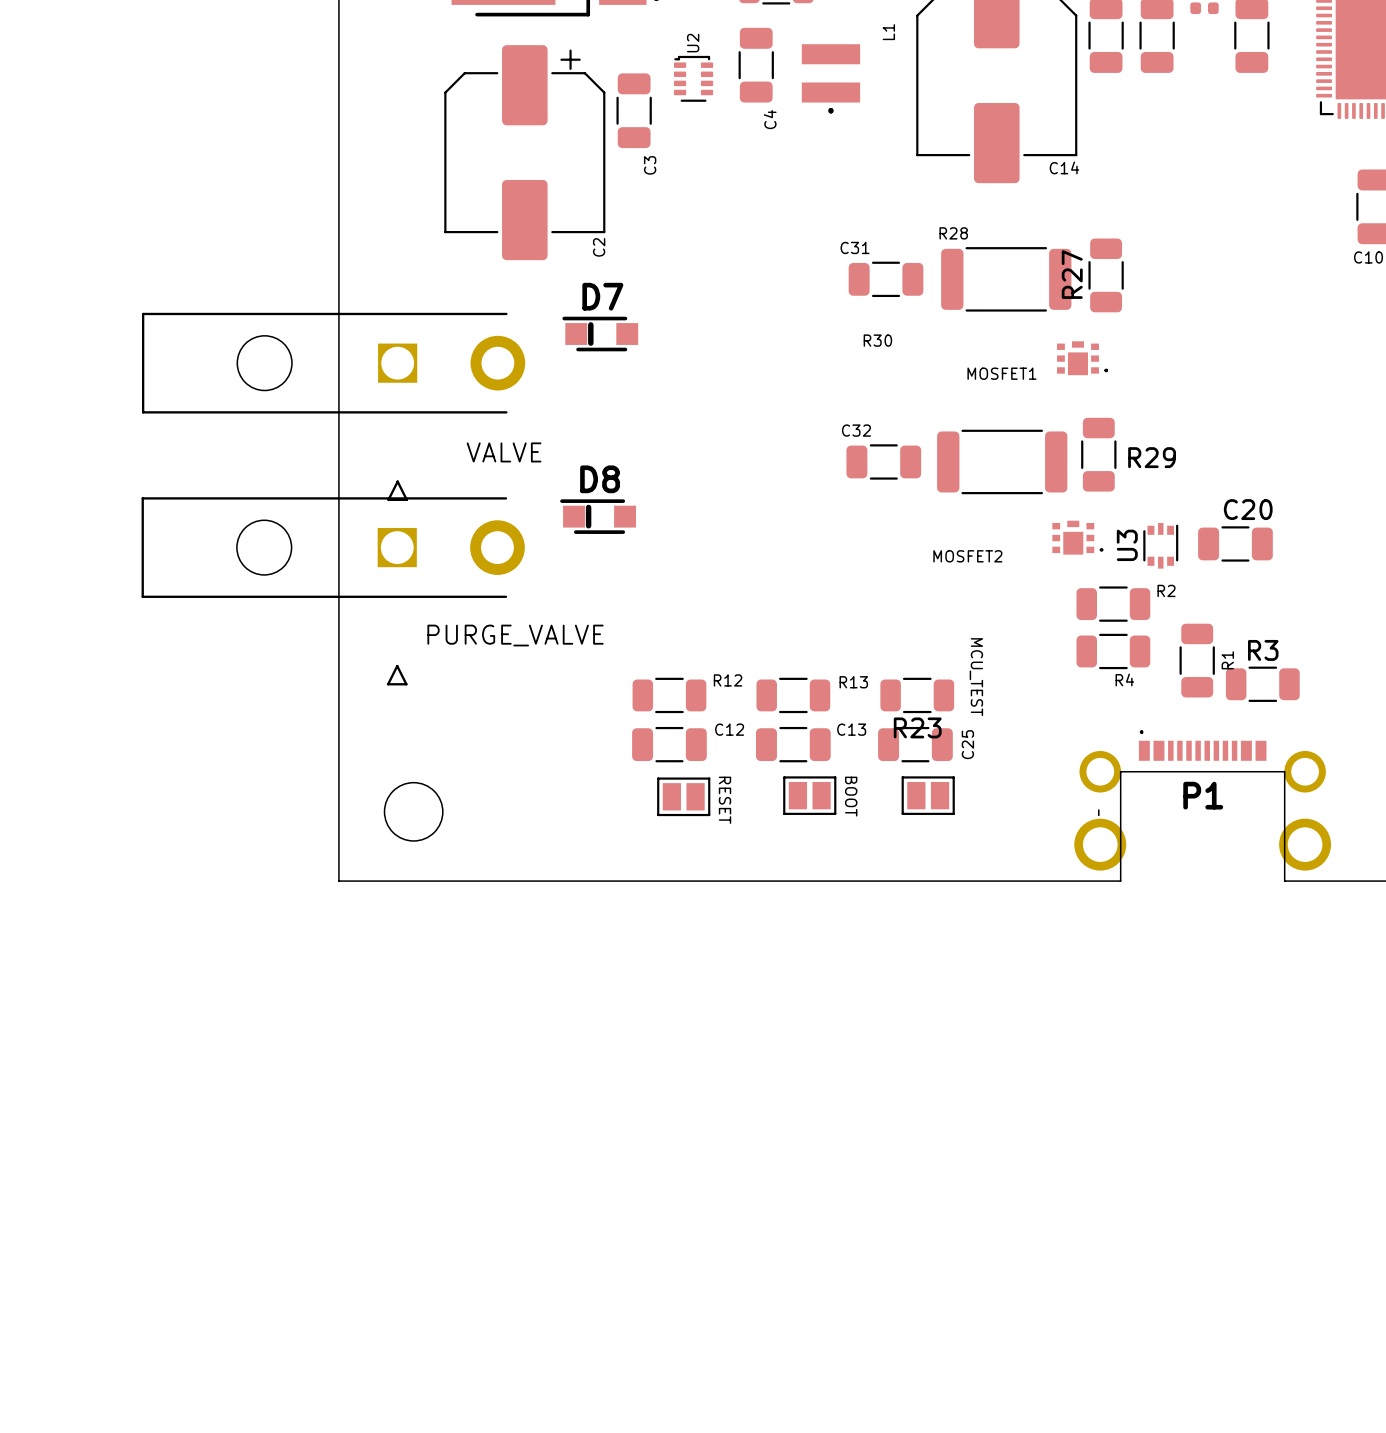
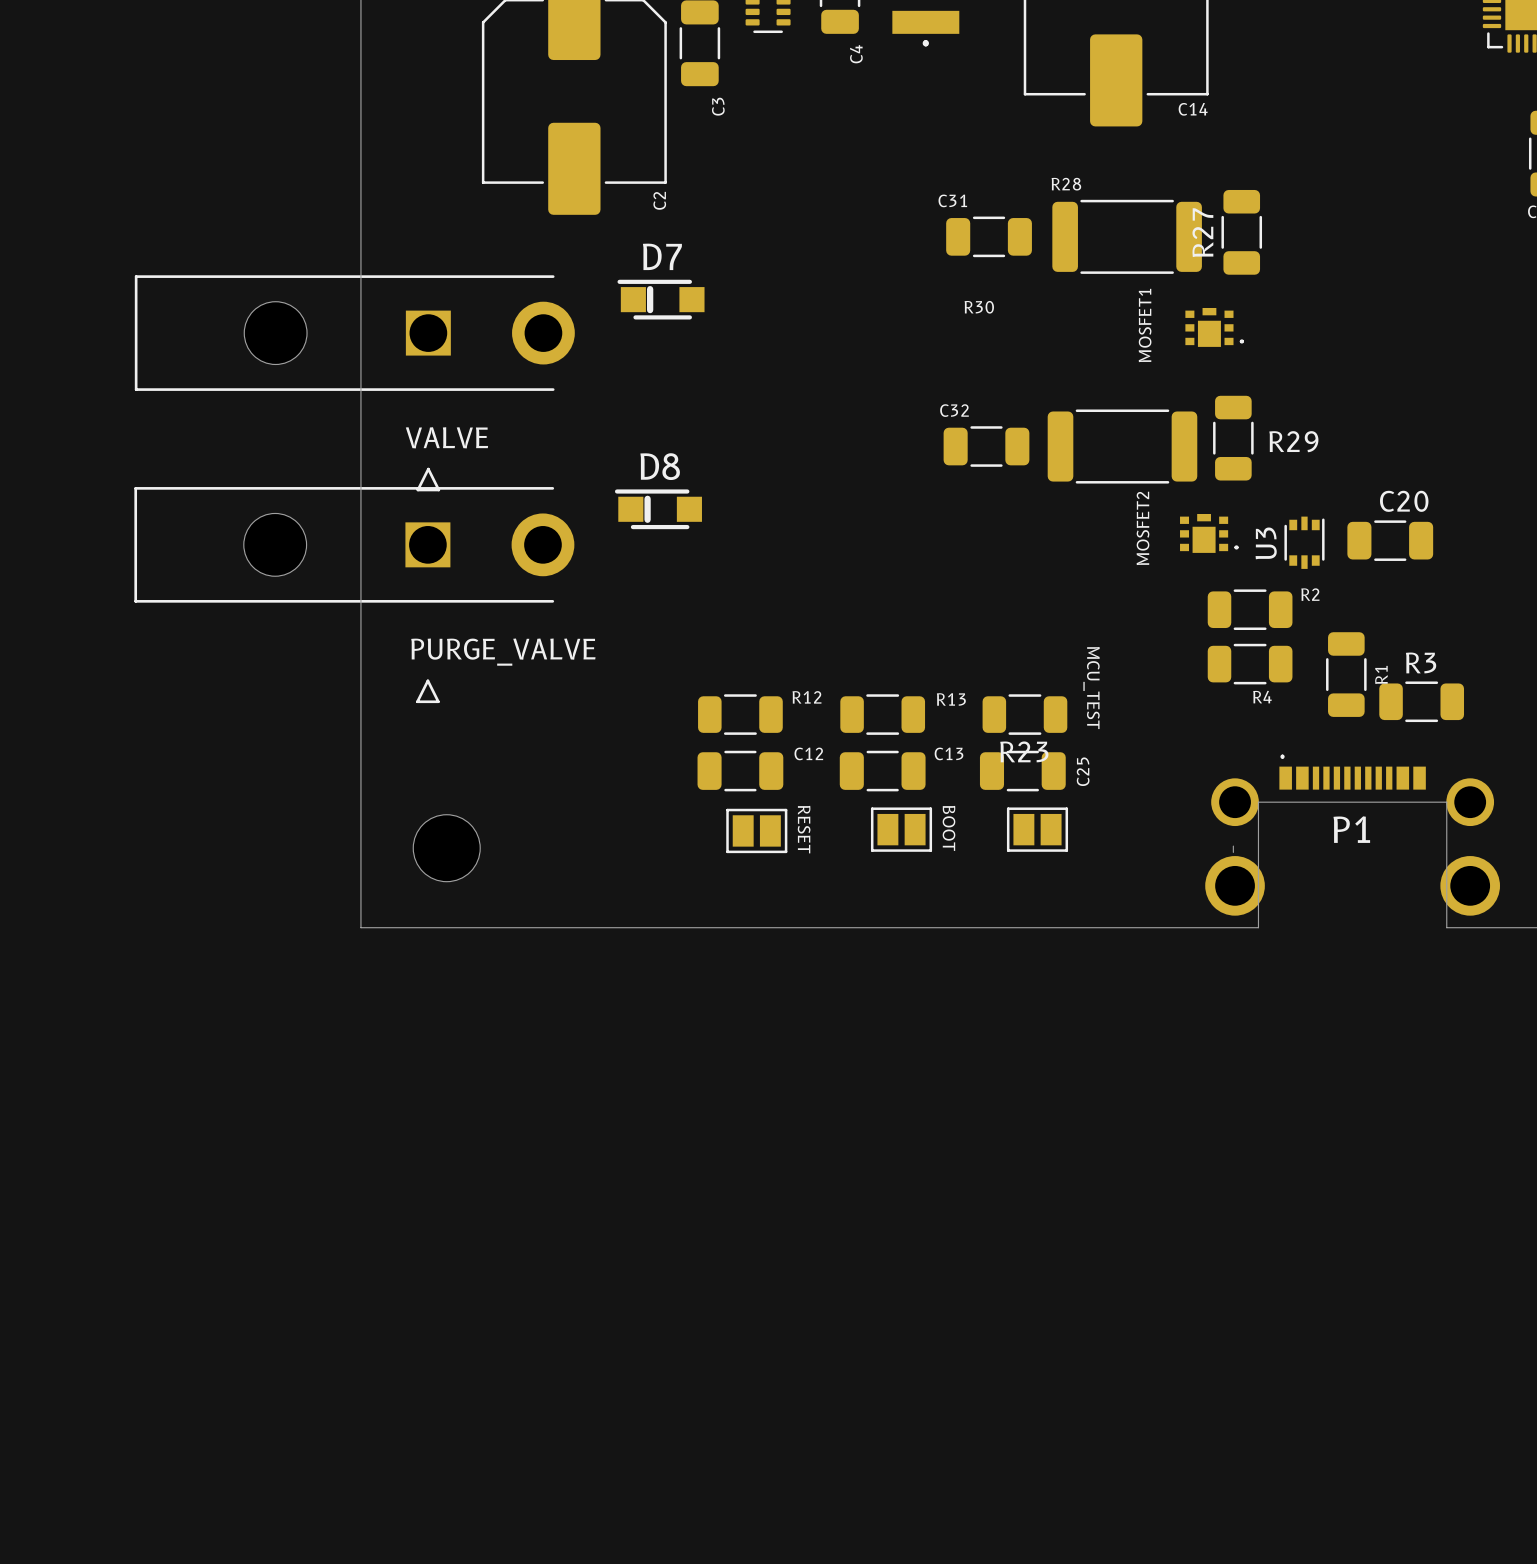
MOSFET1 name rotation: 0° (1001, 373) -> 90° counterclockwise (1145, 325)
text position: VALVE (504, 452) -> VALVE (446, 437)
MOSFET2 name rotation: 0° (967, 556) -> 90° counterclockwise (1143, 528)
text position: PURGE_VALVE (515, 635) -> PURGE_VALVE (503, 652)

